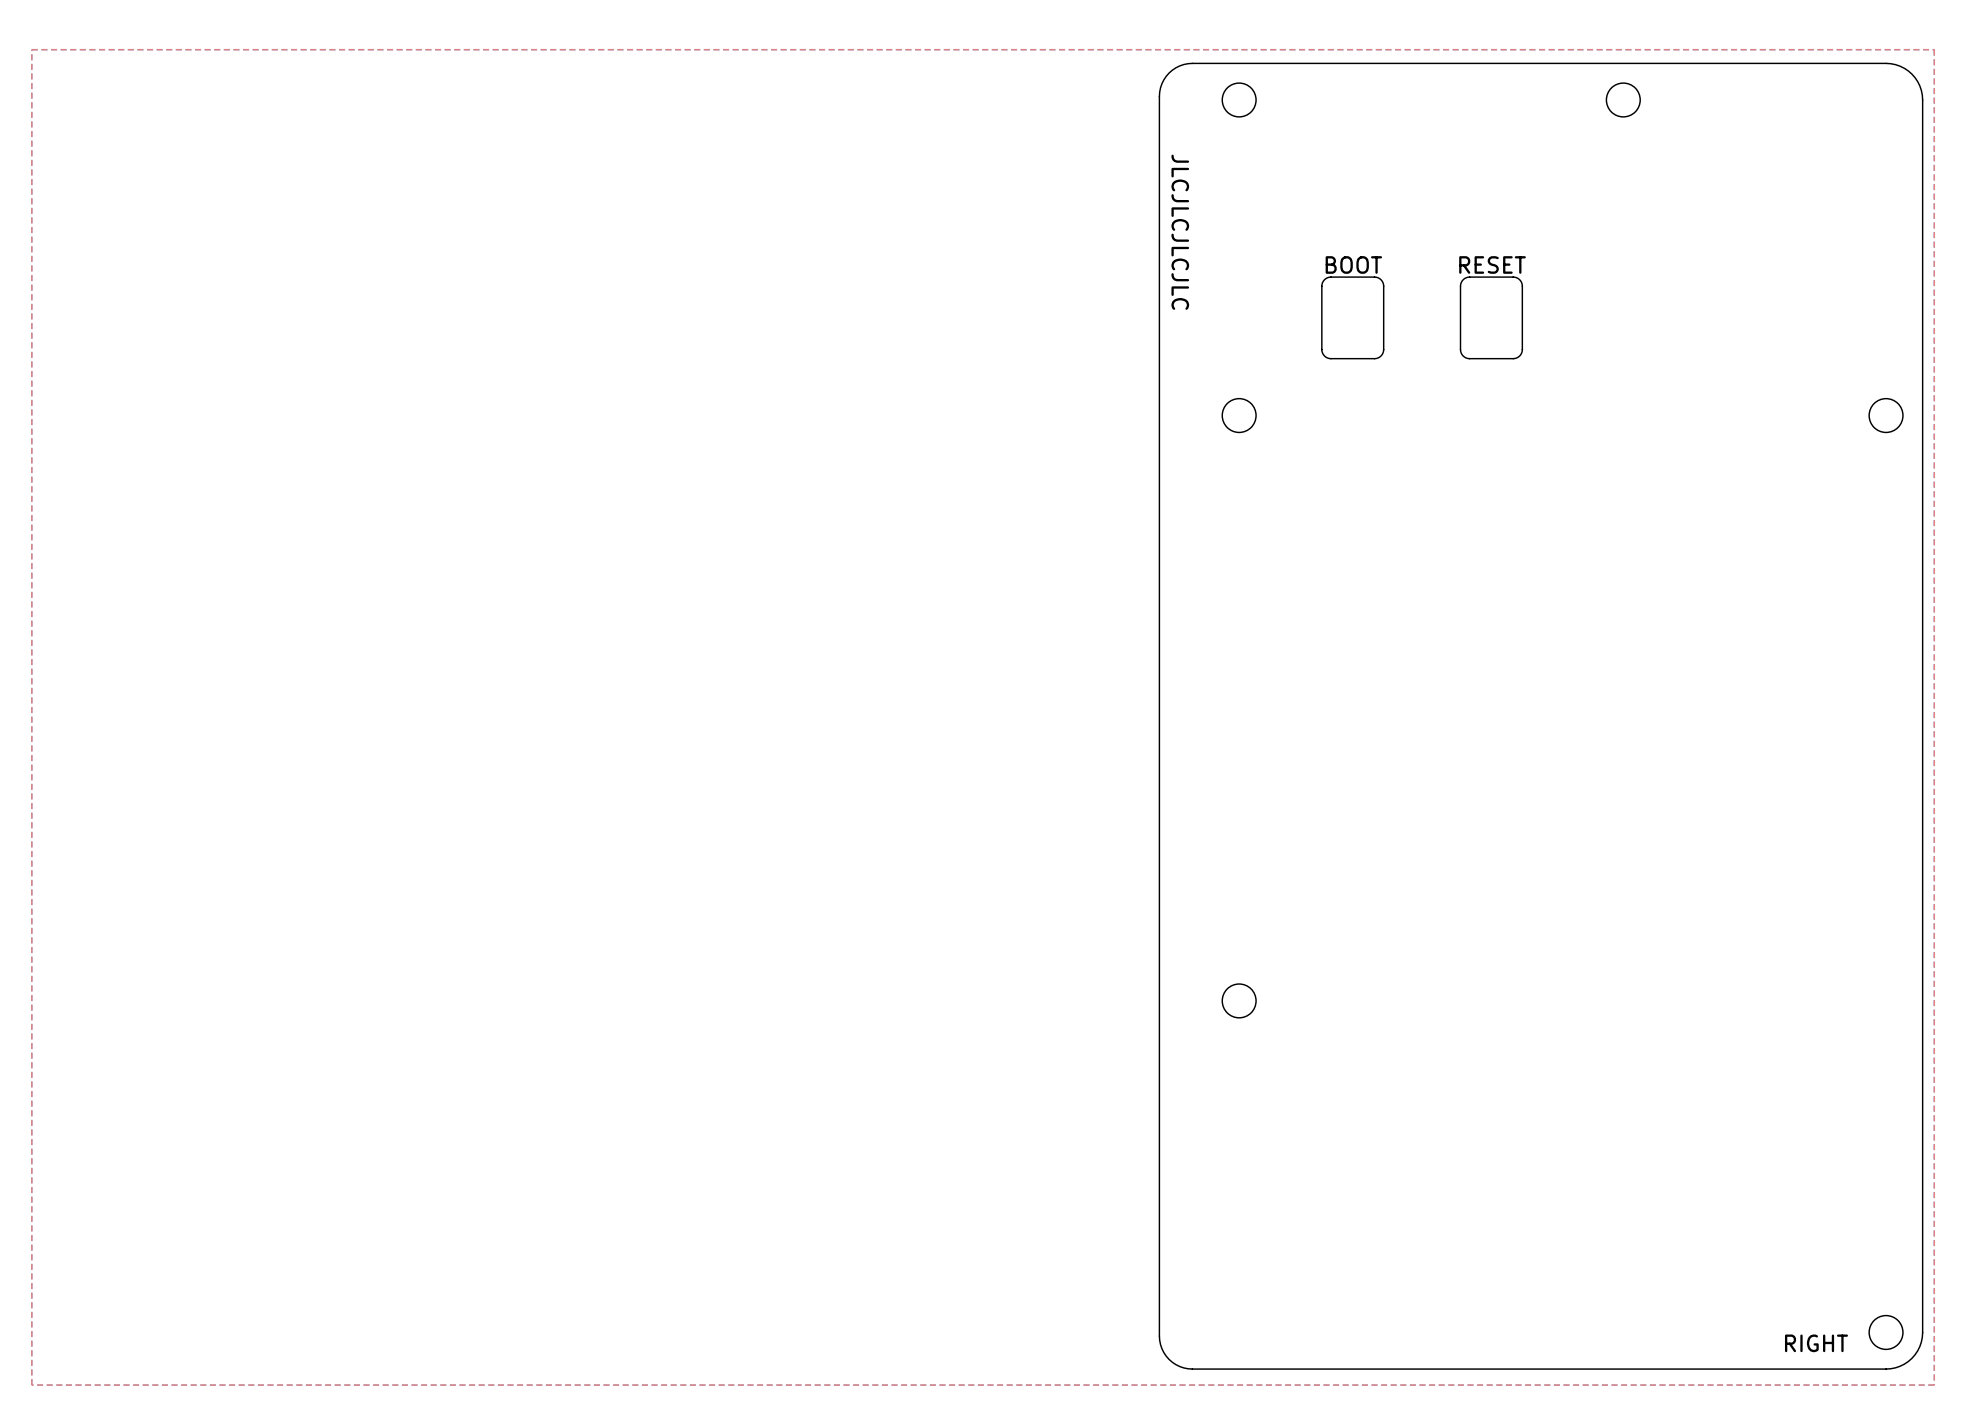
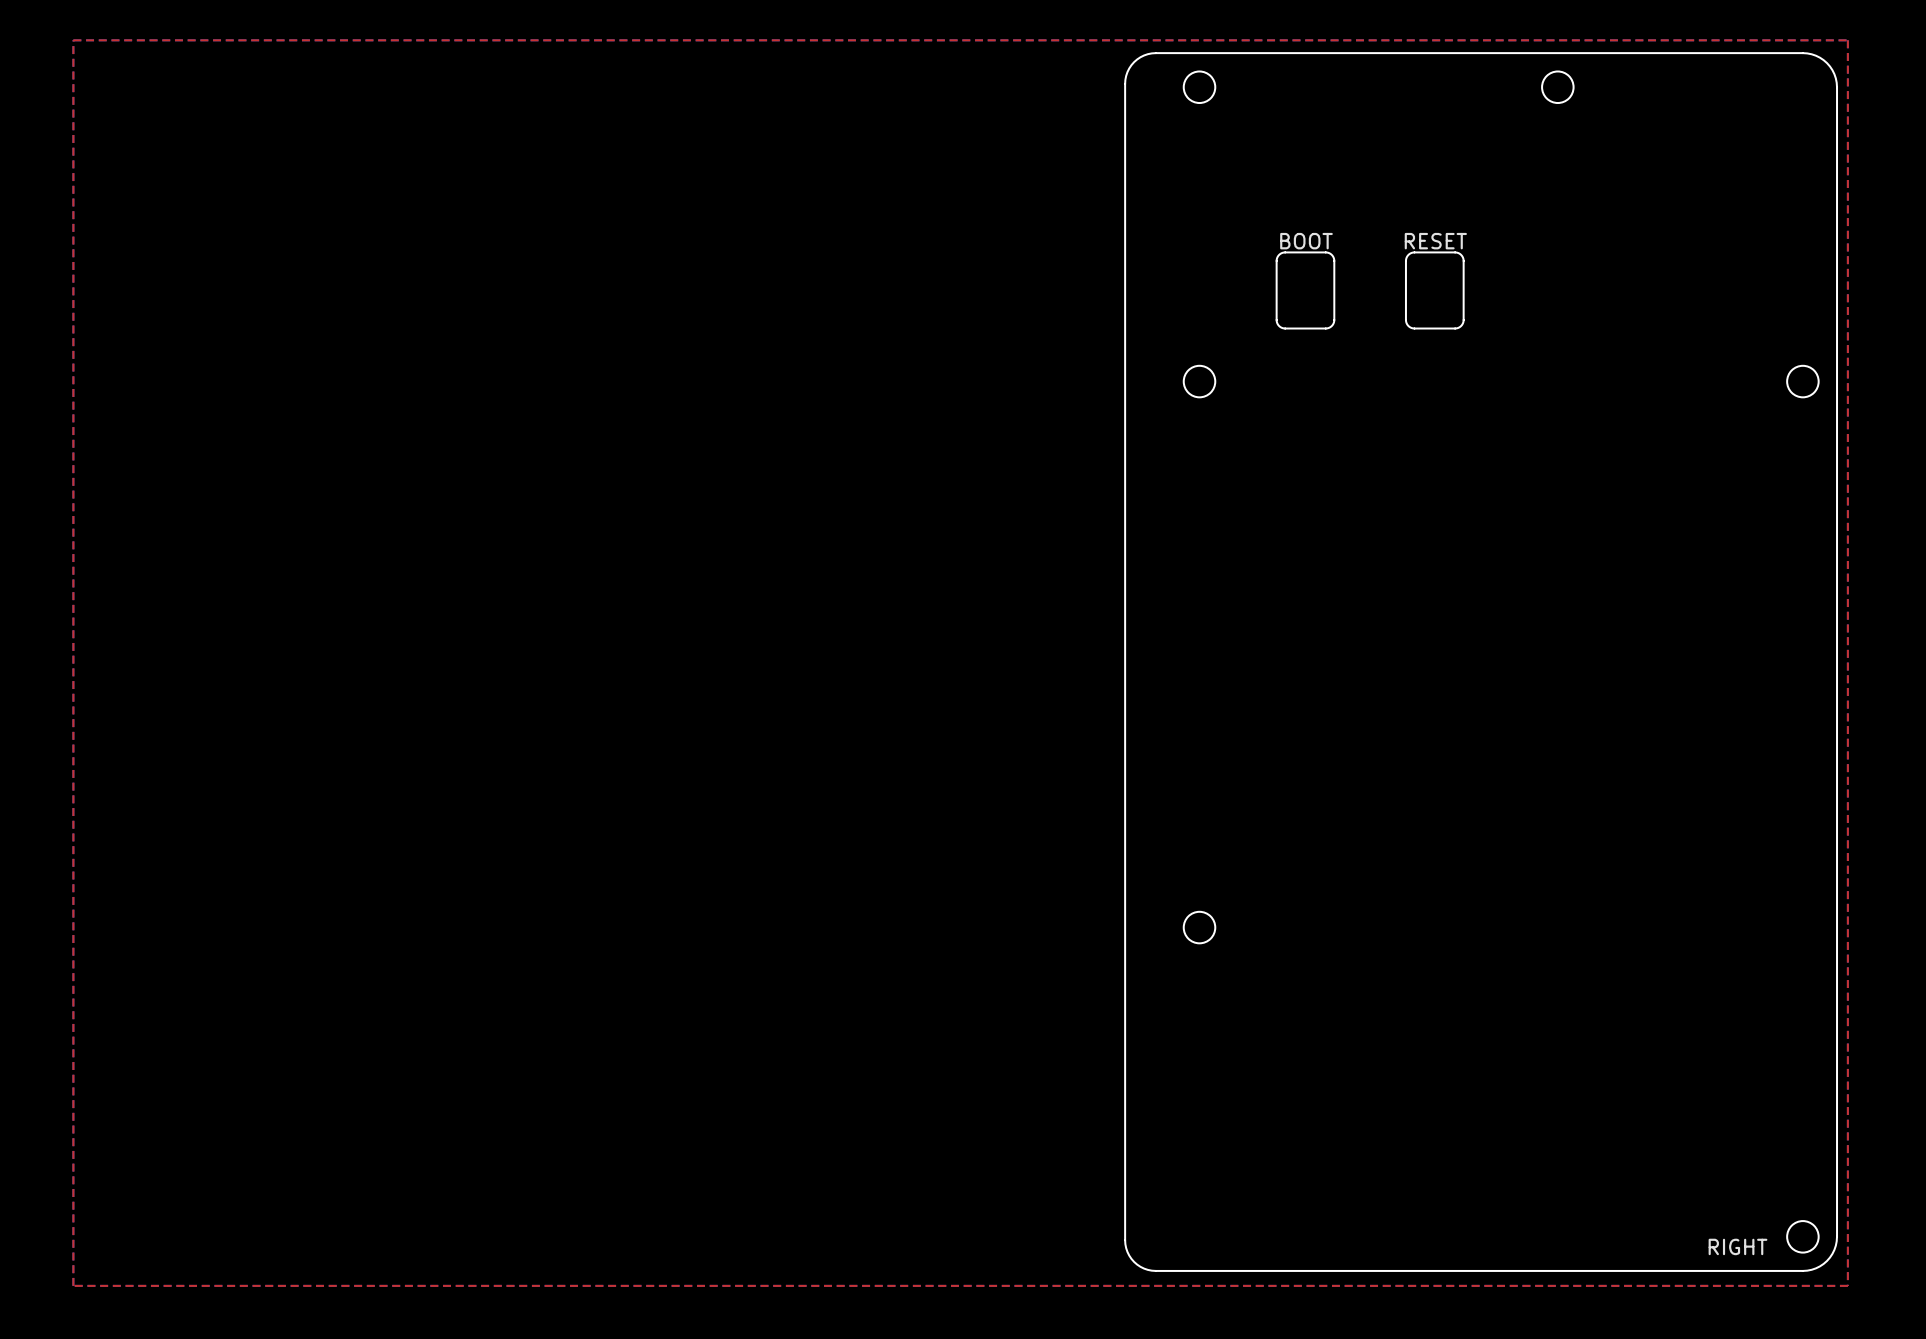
text: JLCJLCJLCJLC (1180, 232) -> none

